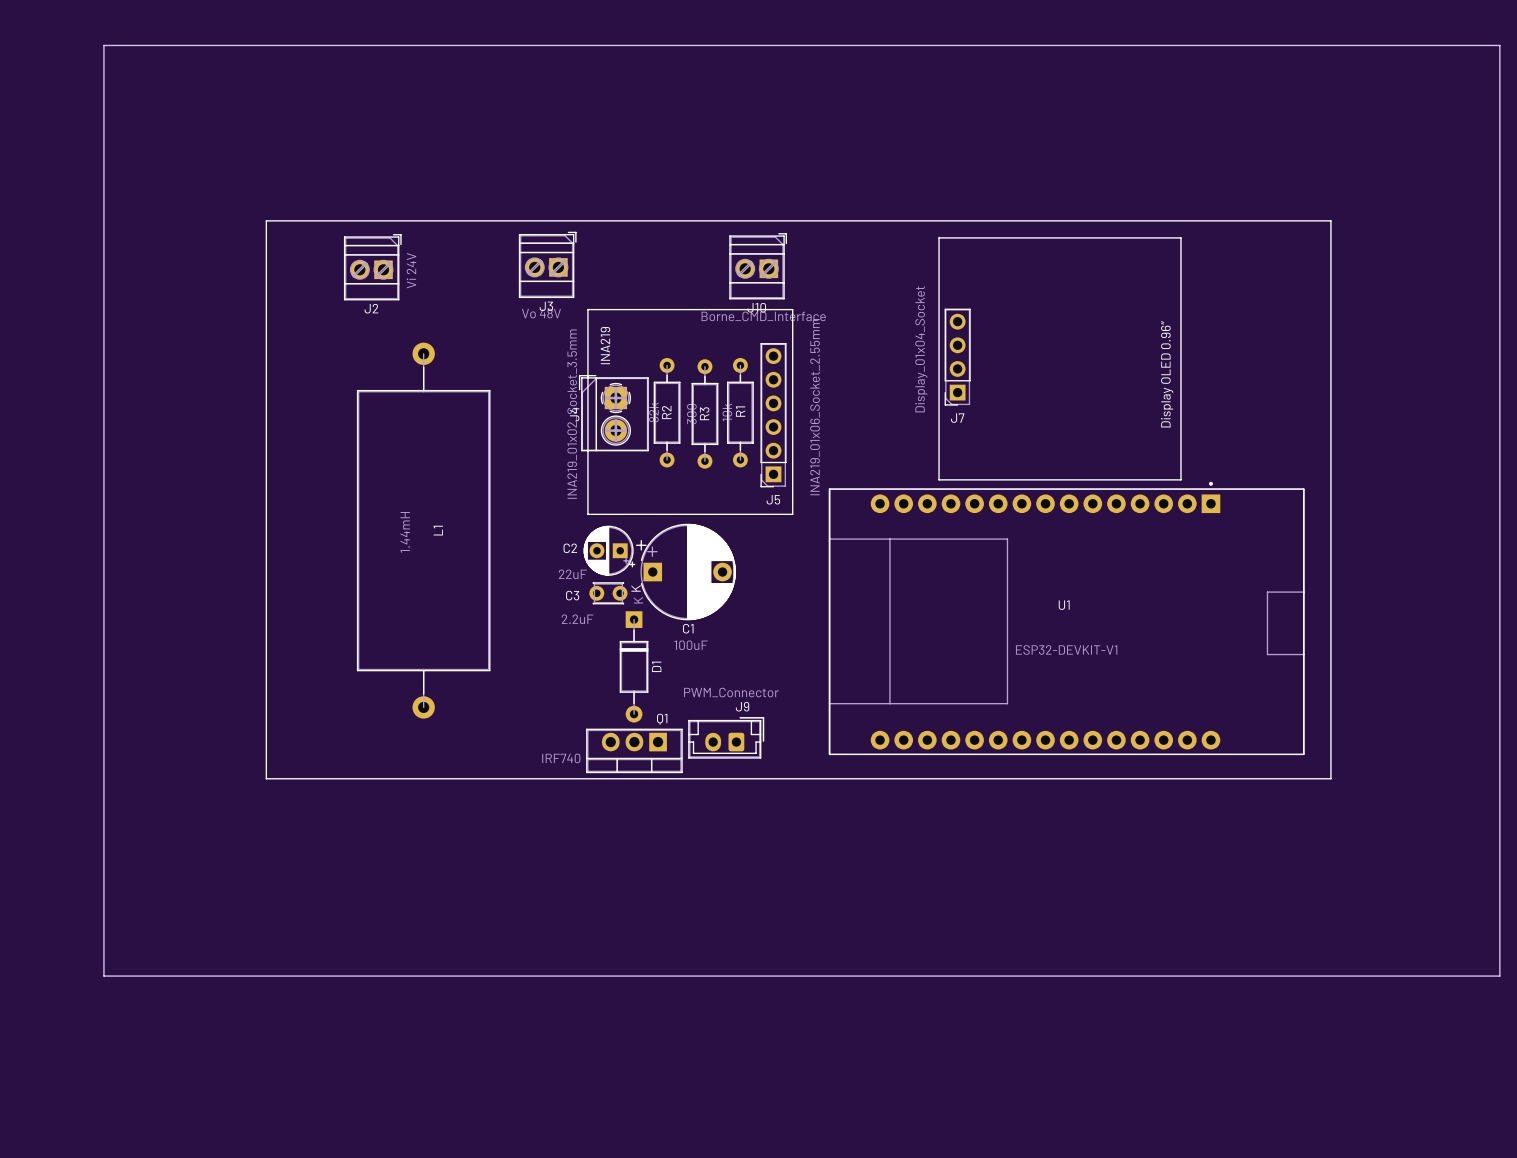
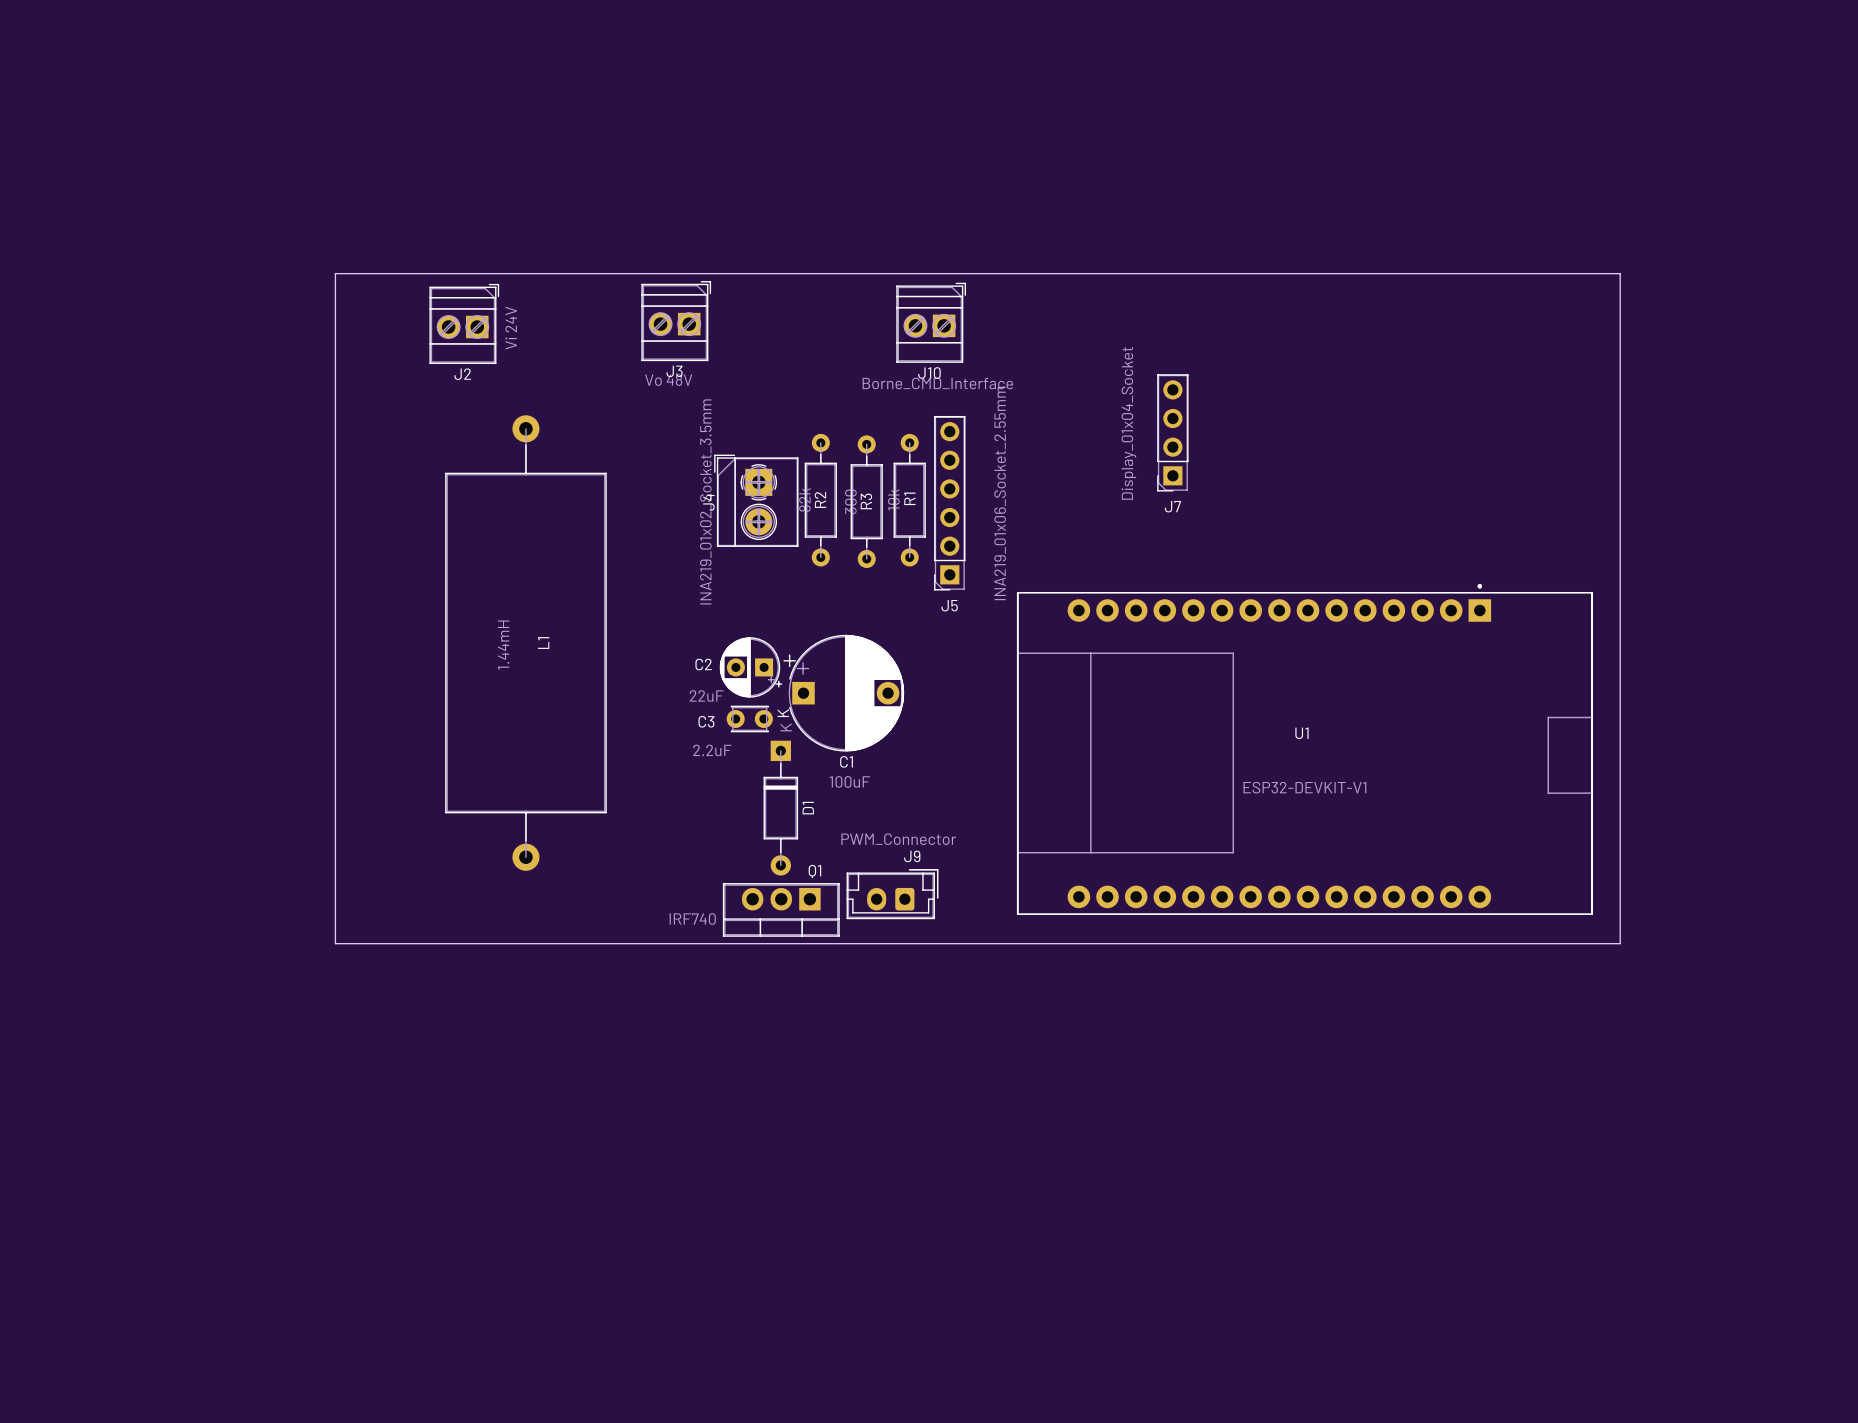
board edge: (103, 45) (1499, 45) (1499, 976) (103, 976) (103, 45) -> none
line: (266, 220) (1330, 220) (1330, 778) (266, 778) (266, 220) -> none
board edge: none -> (335, 273) (1620, 273) (1620, 943) (335, 943) (335, 273)
line: (939, 237) (1180, 237) (1180, 479) (939, 479) (939, 237) -> none
line: (587, 309) (792, 309) (792, 514) (587, 514) (587, 309) -> none
text: INA219 (605, 345) -> none
text: Display OLED 0.96″ (1167, 374) -> none

